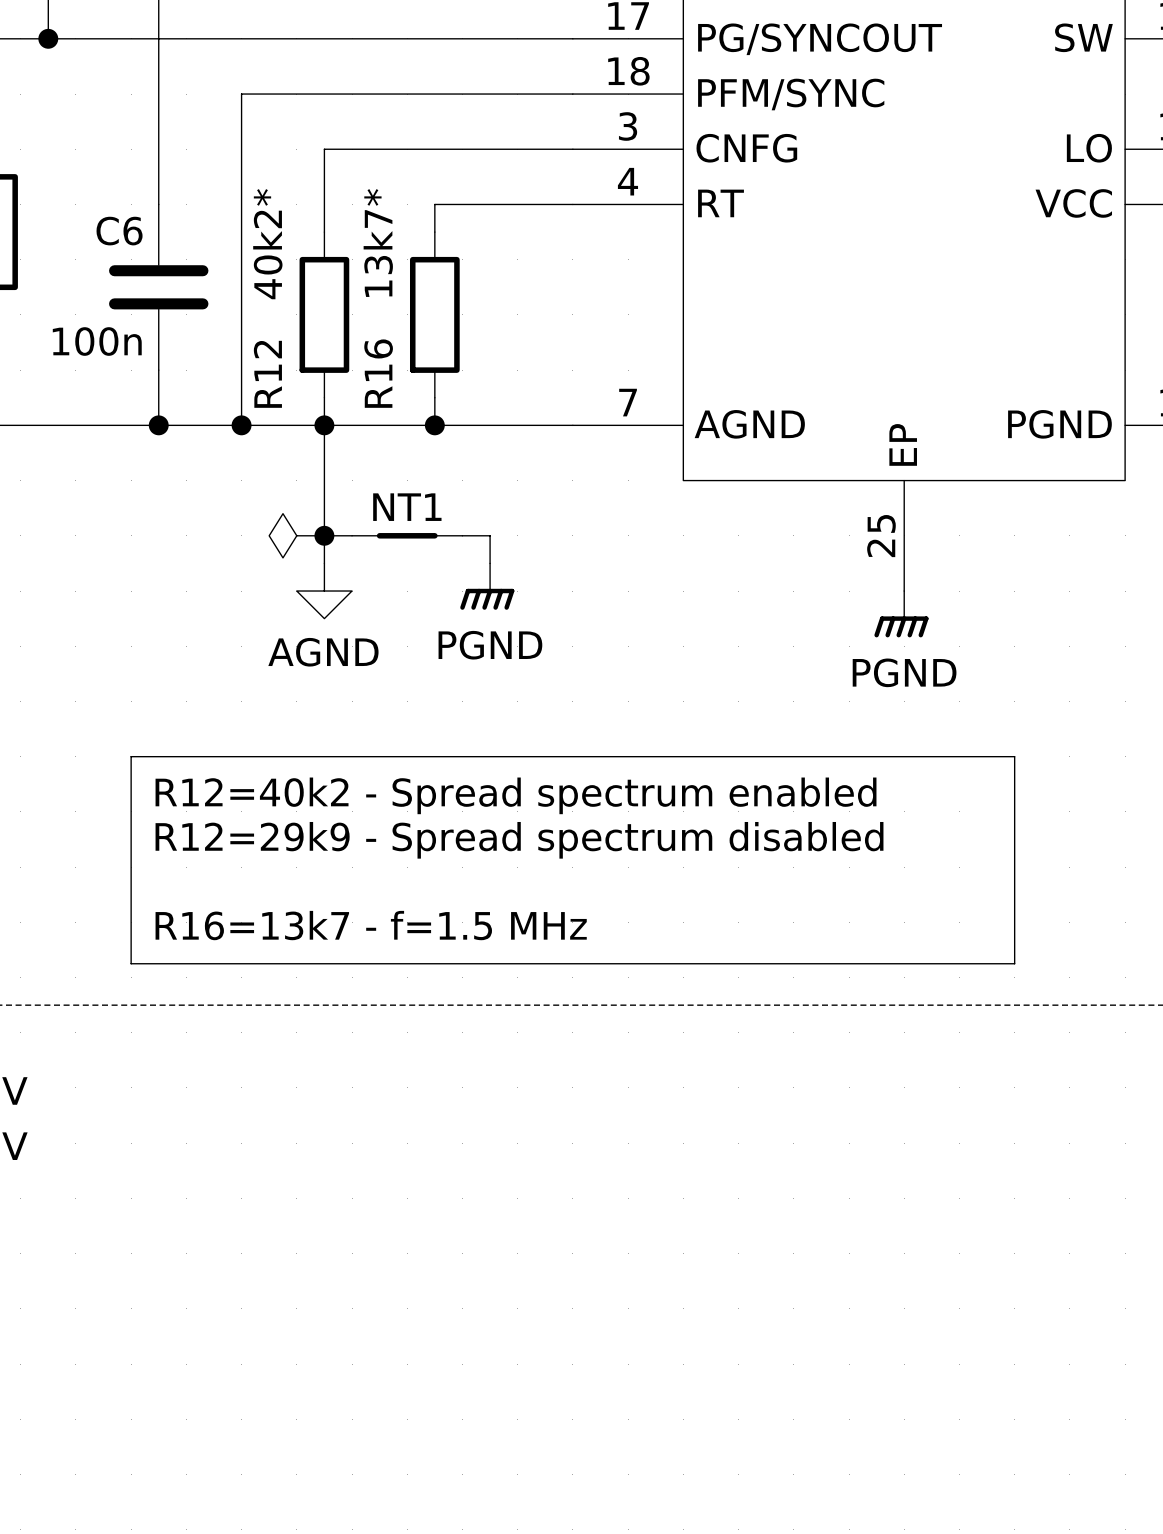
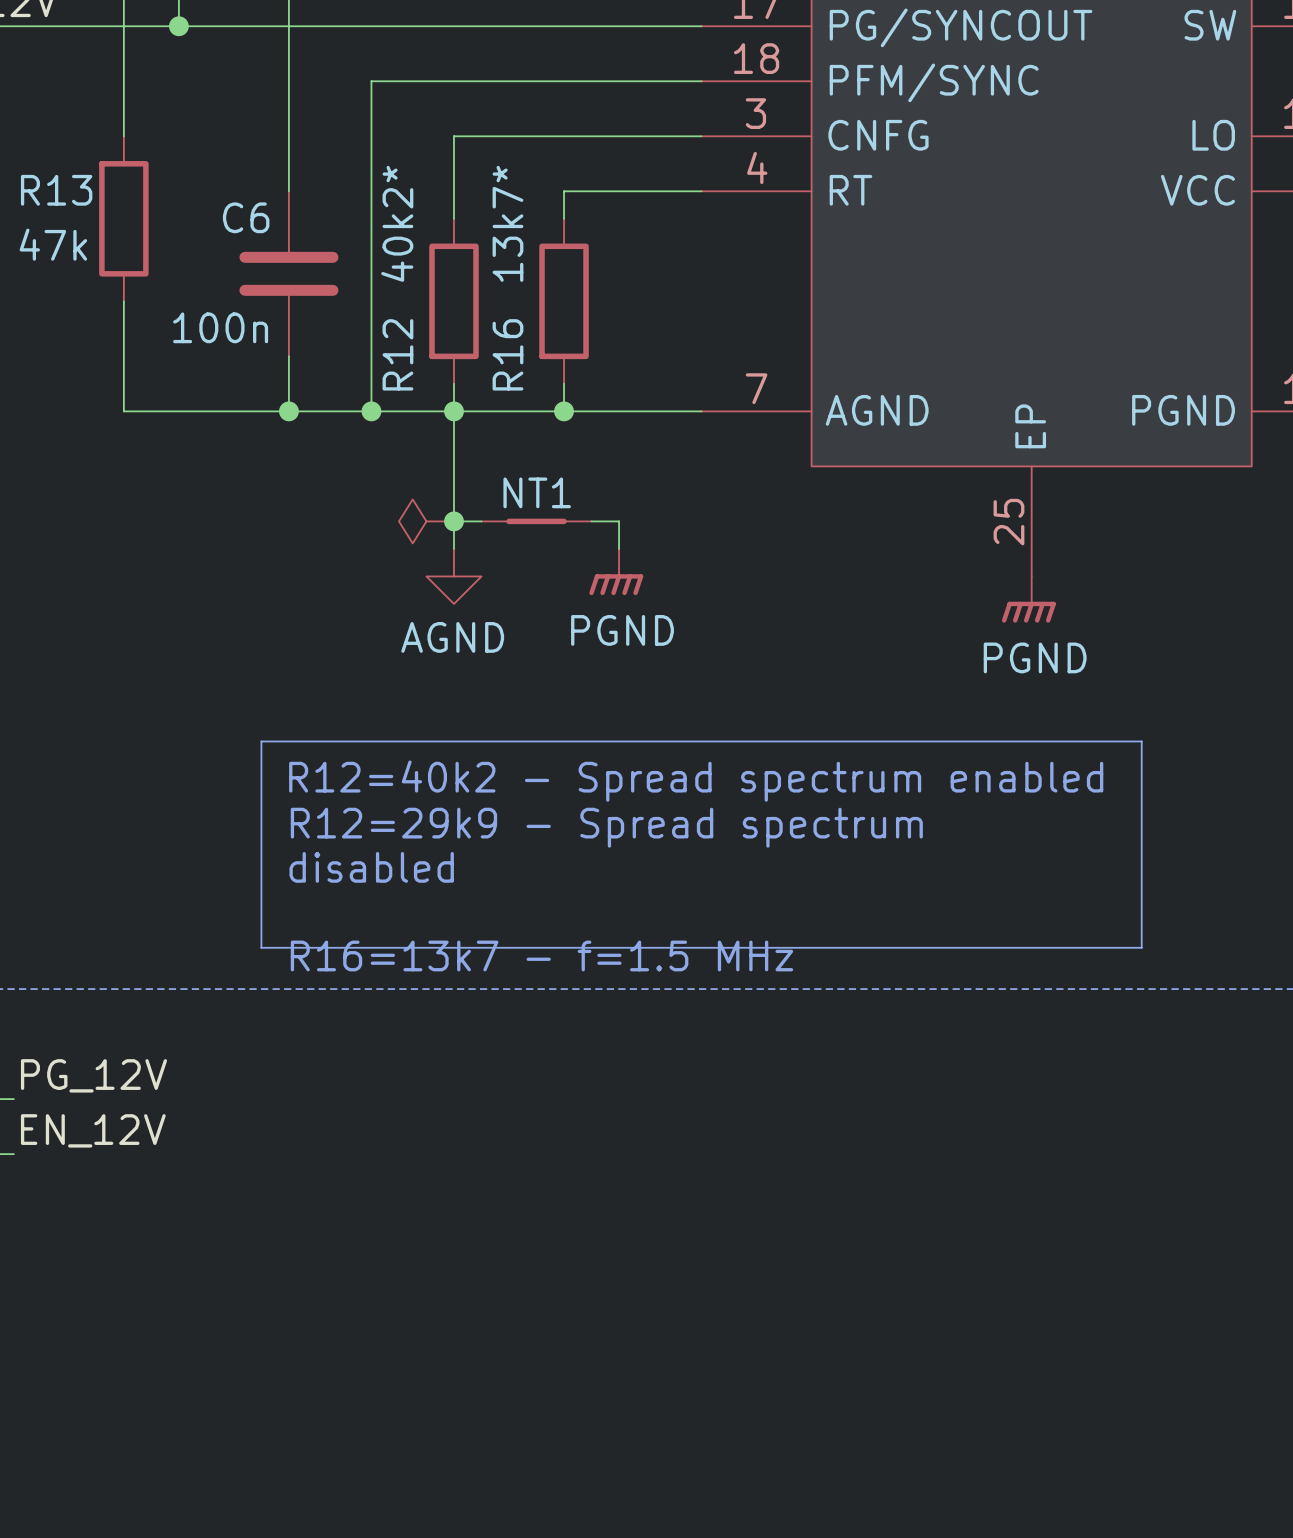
text: R12=29k9 - Spread spectrum disabled (519, 840) -> R12=29k9 - Spread spectrum (606, 827)
text: none -> disabled (371, 867)
text position: R16=13k7 - f=1.5 MHz (371, 925) -> R16=13k7 - f=1.5 MHz (541, 955)

